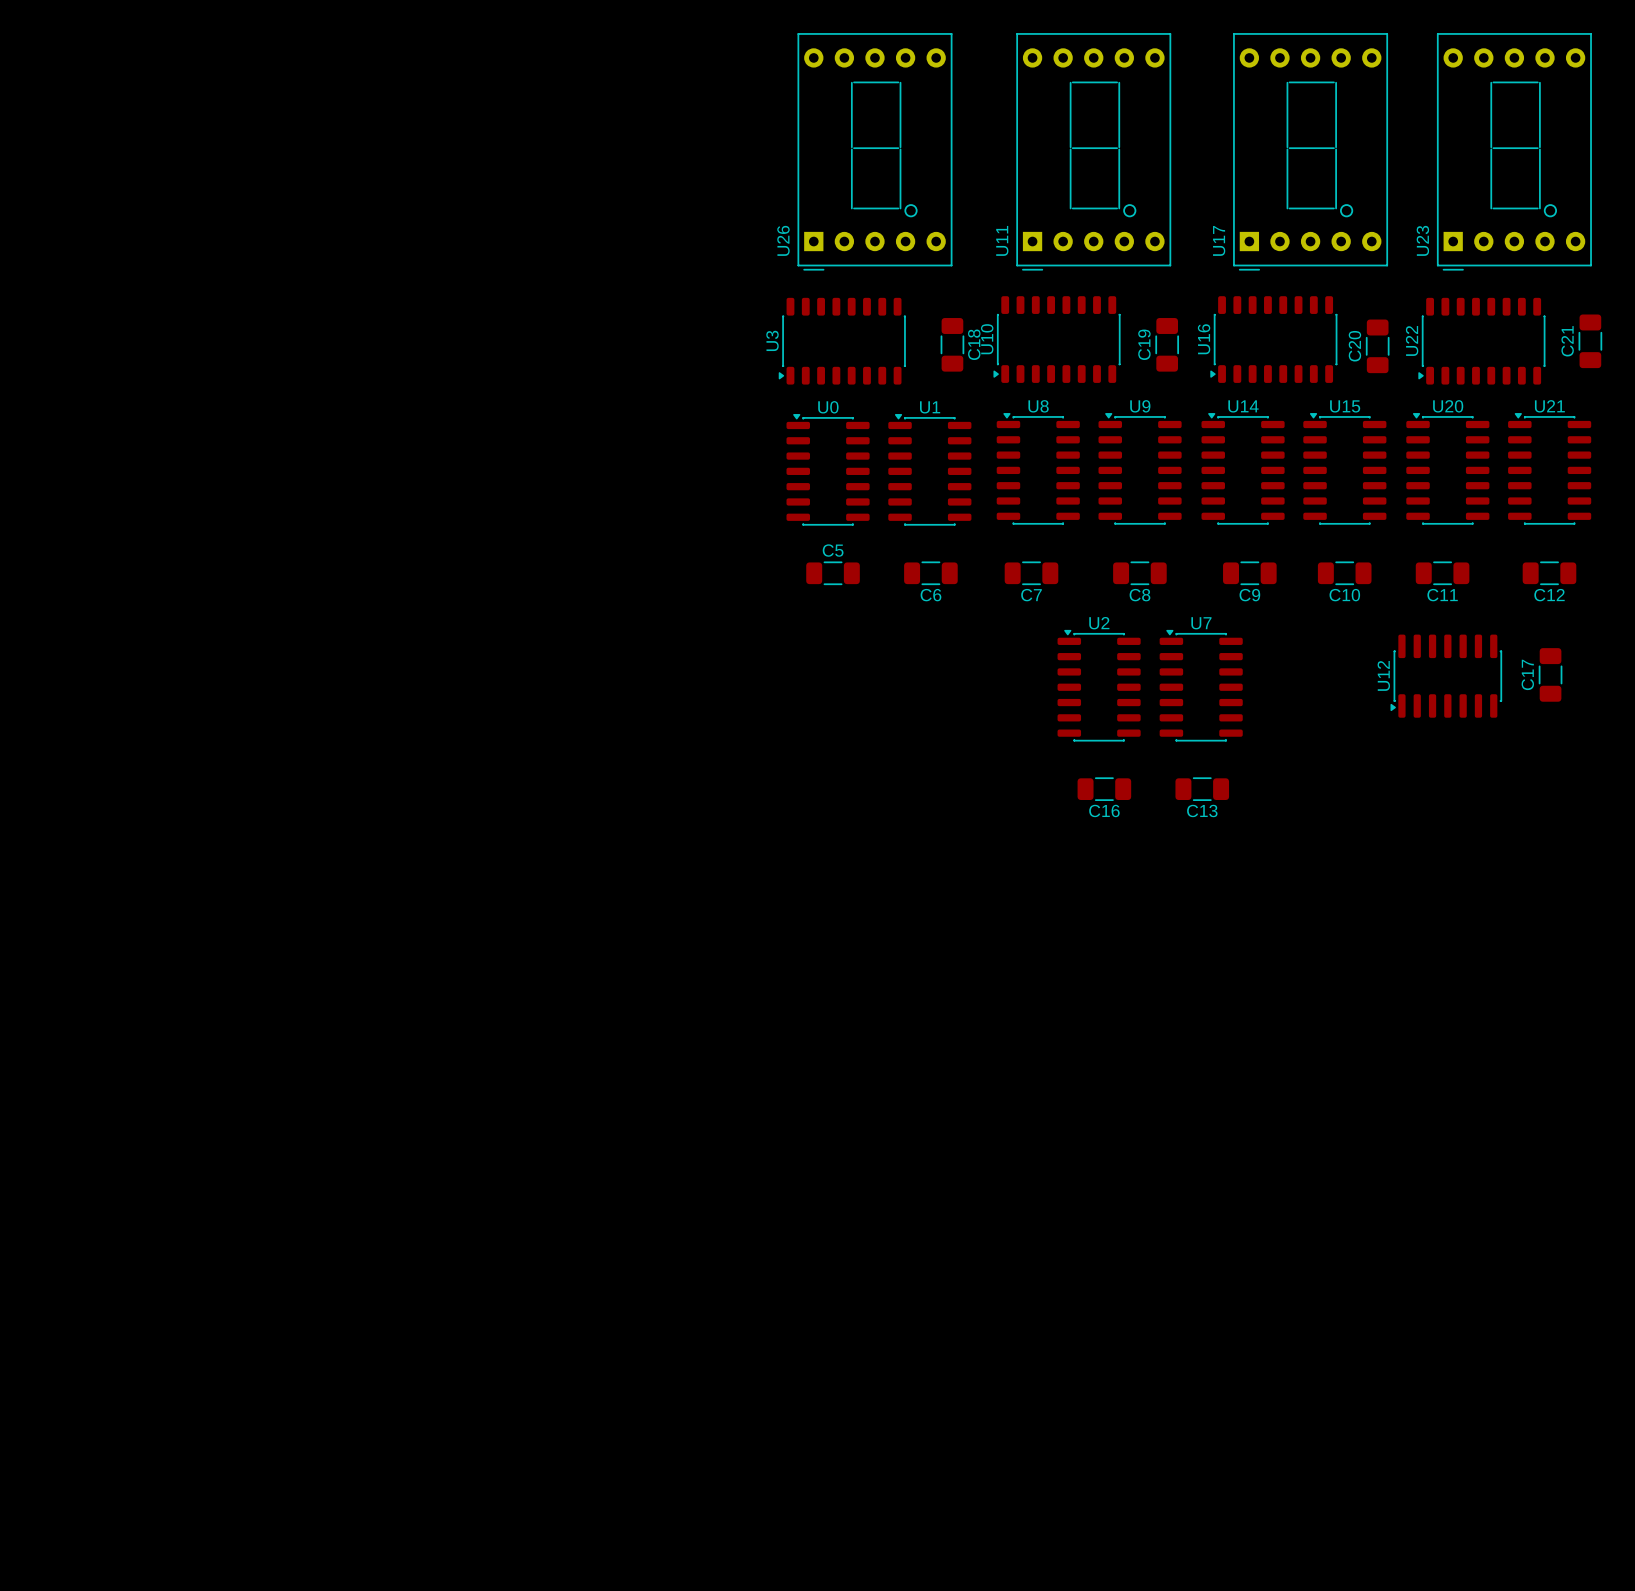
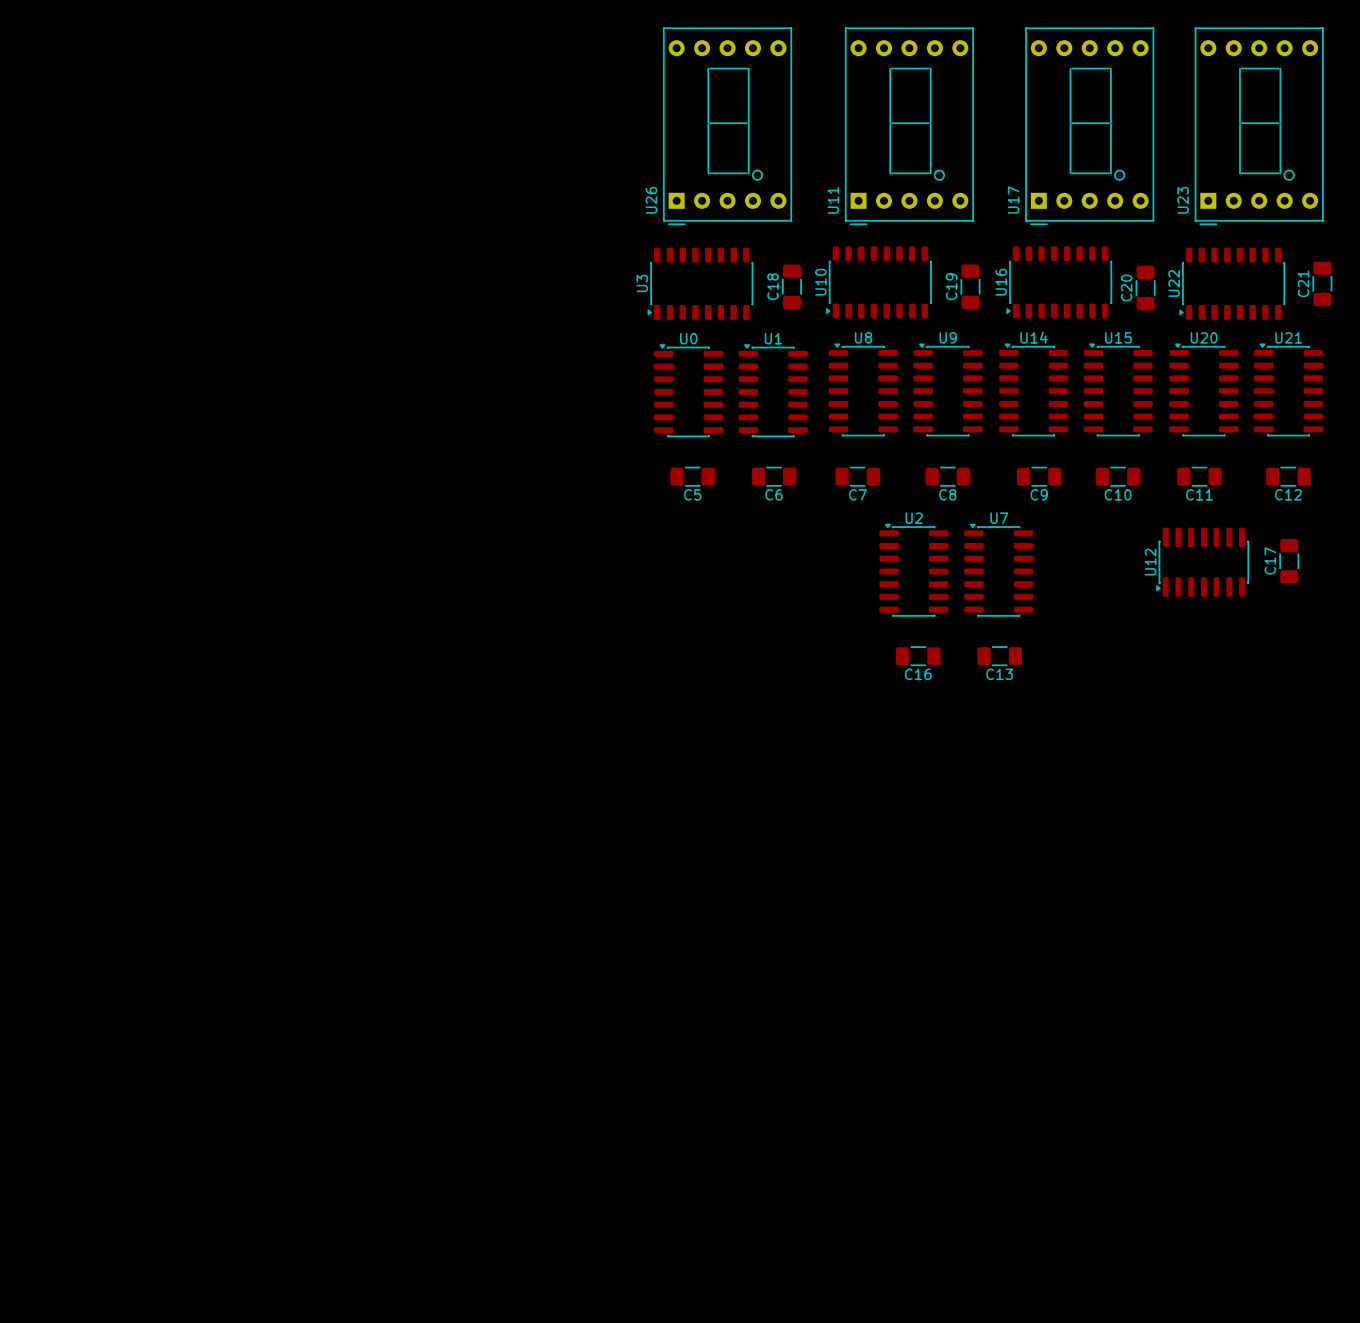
C18 name position: C18 (974, 344) -> C18 (773, 286)
C5 name position: C5 (833, 550) -> C5 (692, 494)

